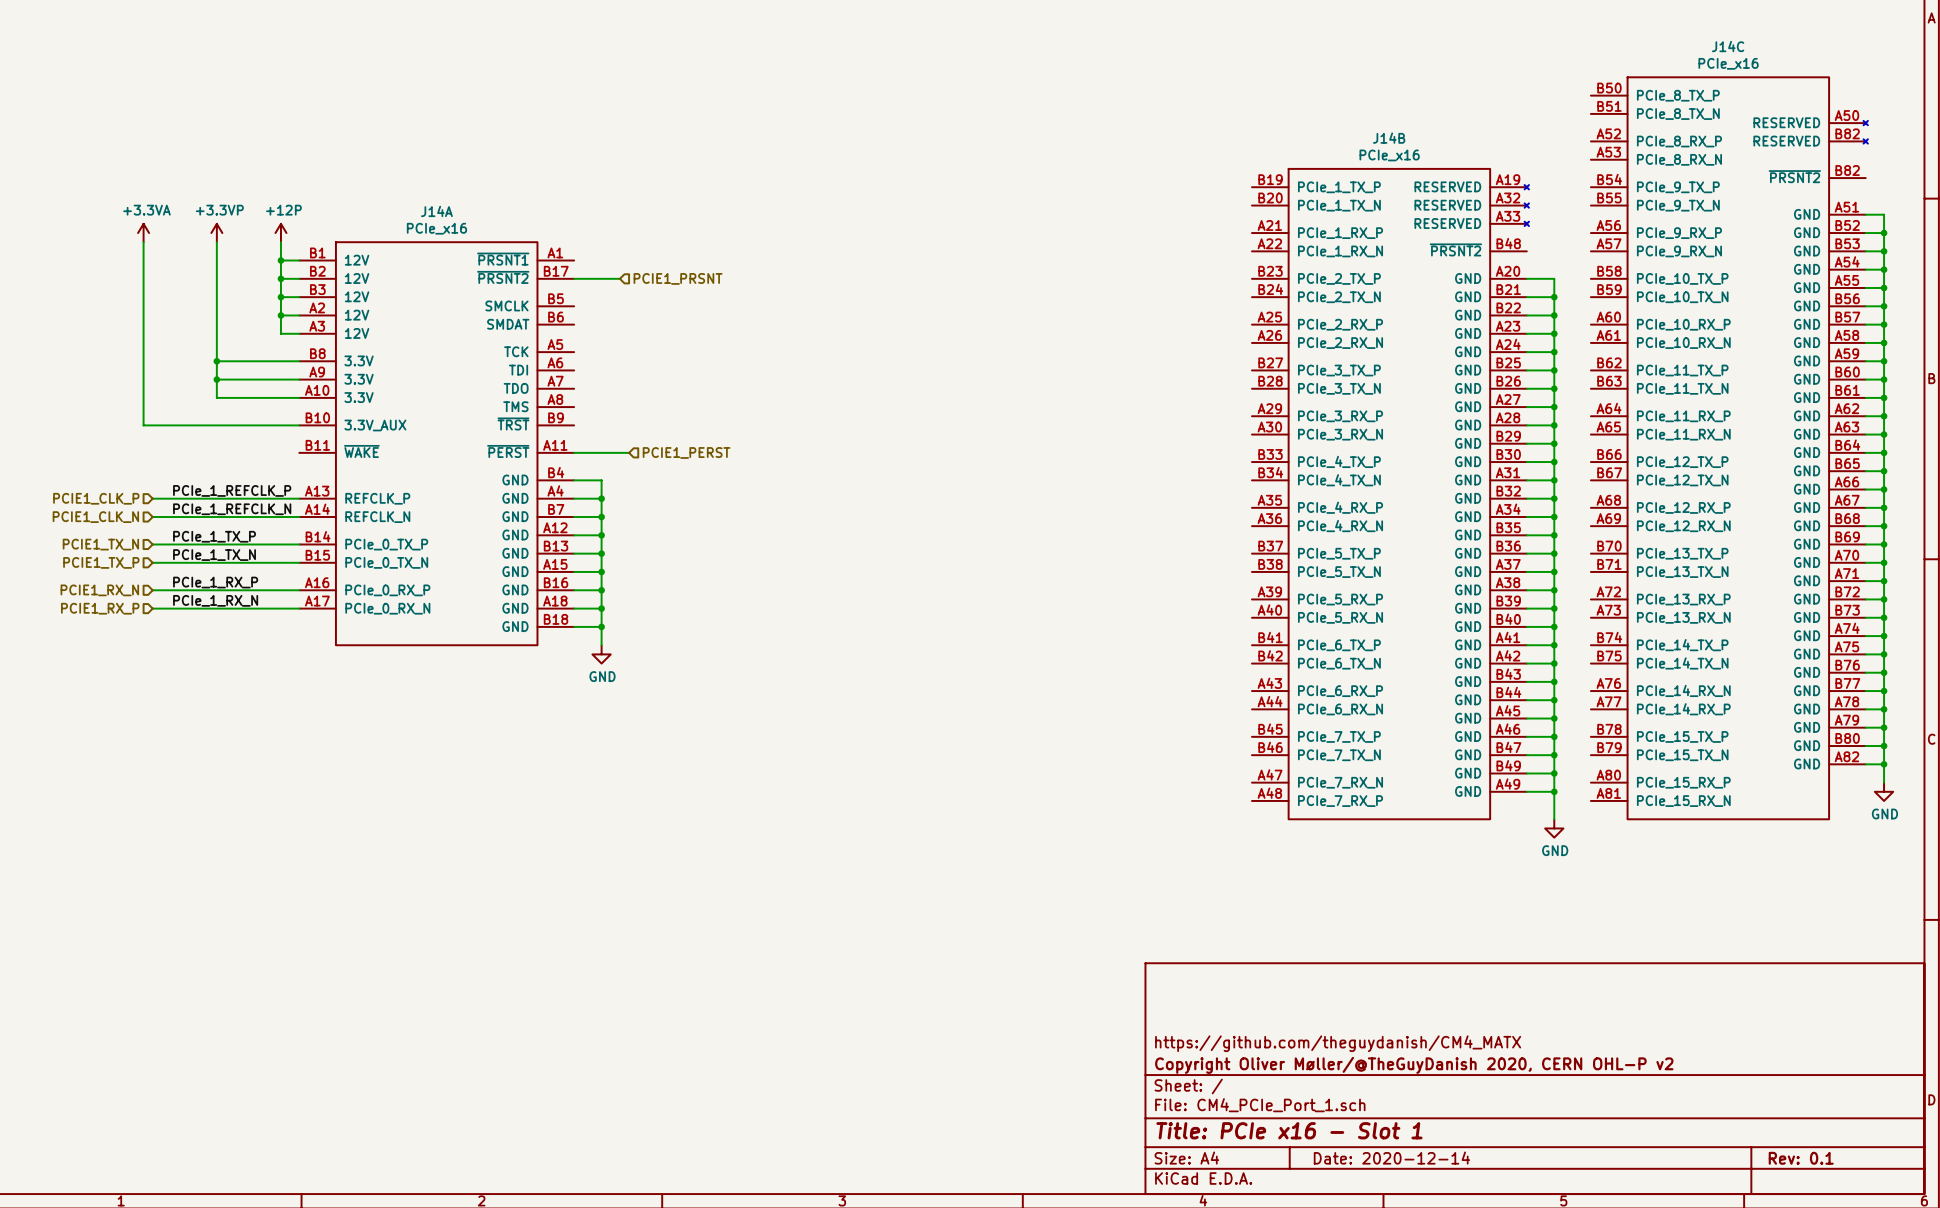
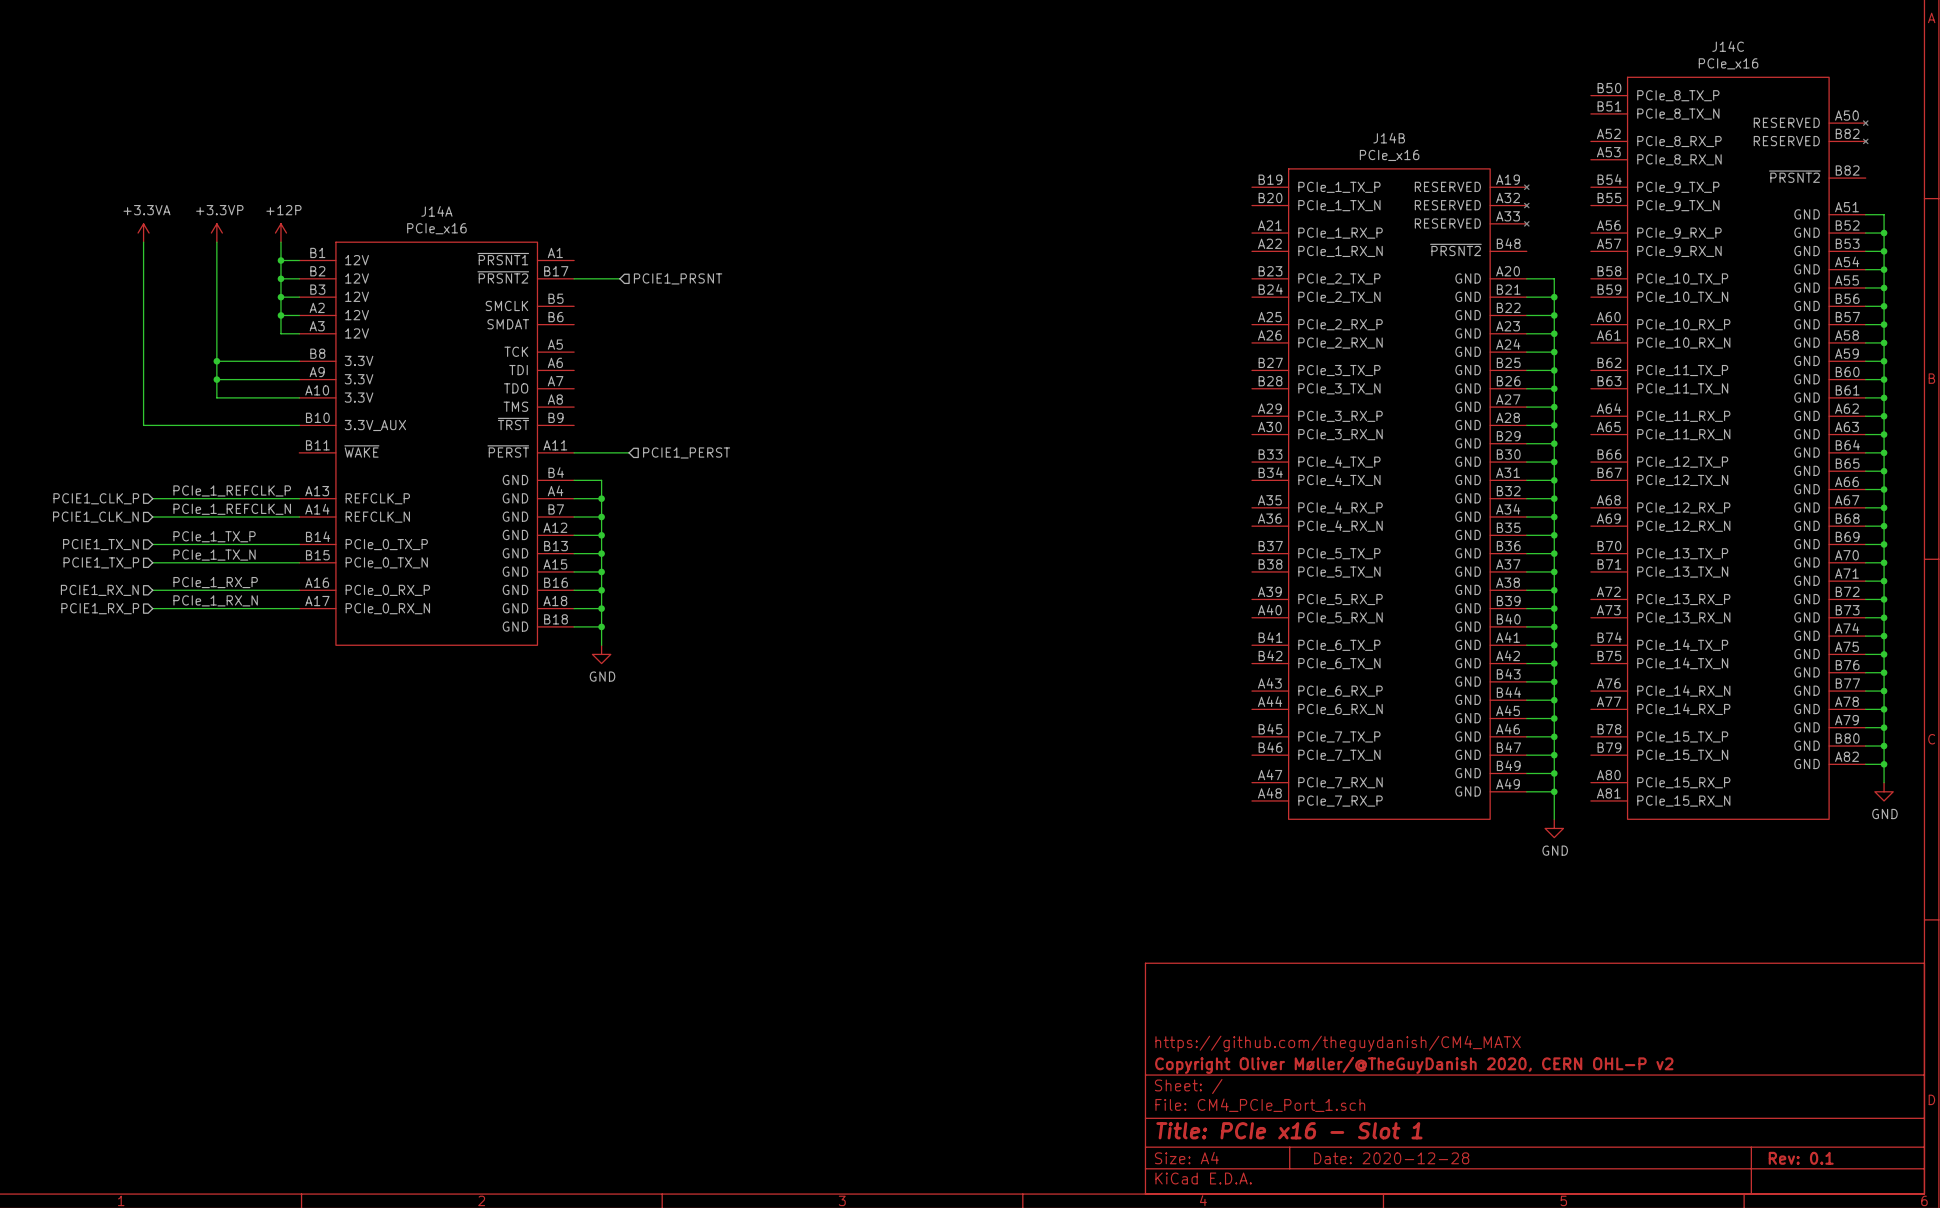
title block: Date: 2020-12-14 (1391, 1158) -> Date: 2020-12-28 (1391, 1158)

